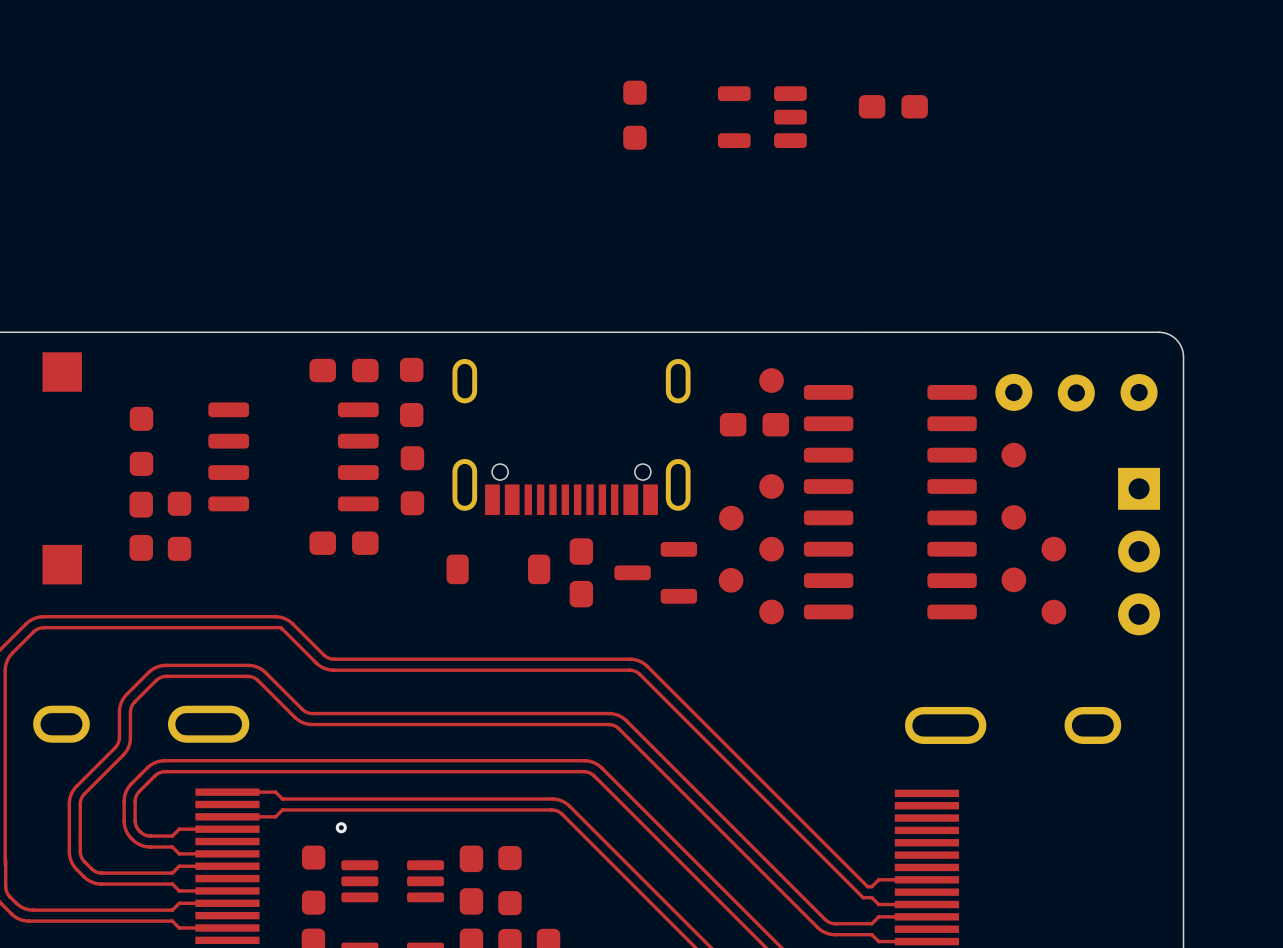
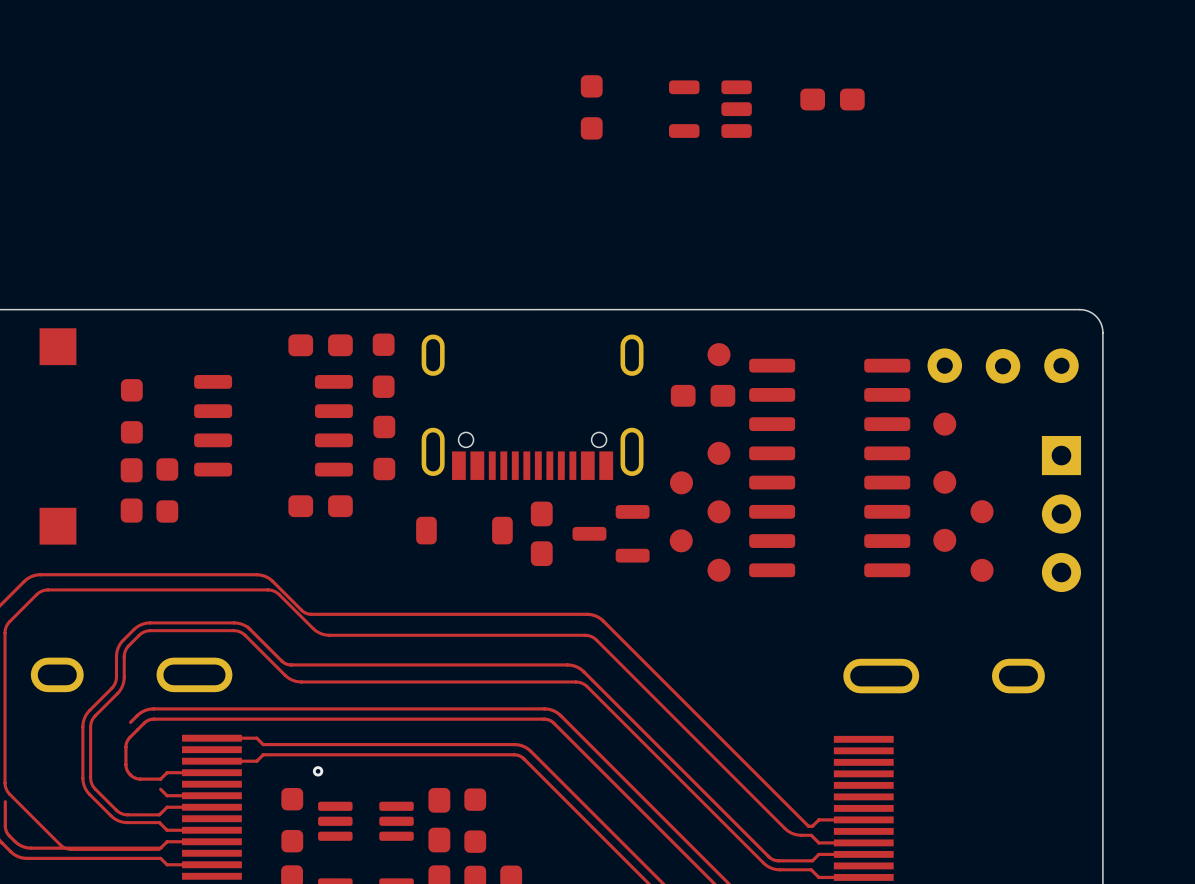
top track: (265, 672) (257, 667) (248, 665) (166, 665) (152, 669) (126, 694) (121, 702) (119, 738) (116, 745) (76, 786) (71, 794) (69, 803) (69, 856) (73, 865) (85, 878) (99, 883) (172, 884) -> (250, 629) (242, 624) (234, 622) (150, 622) (139, 625) (123, 640) (118, 647) (114, 685) (84, 717) (82, 778) (86, 790) (118, 820) (160, 823)
top track: (139, 775) (129, 785) (125, 794) (124, 820) (126, 830) (132, 839) (143, 845) (172, 847) -> none
top track: (5, 864) (5, 668) (10, 654) (34, 631) (43, 627) (280, 627) (318, 664) (331, 670) (635, 671) (863, 897) (871, 897) -> (159, 849) (65, 848) (6, 789) (5, 629) (9, 621) (41, 591) (271, 590) (279, 594) (314, 630) (327, 635) (589, 635) (596, 639) (786, 830) (796, 834) (812, 836)
top track: (172, 873) (101, 873) (92, 869) (83, 860) (80, 854) (81, 798) (126, 751) (130, 740) (131, 706) (158, 678) (166, 676) (249, 676) (257, 679) (296, 718) (309, 724) (614, 725) (819, 929) (832, 934) (871, 934) -> (160, 813) (121, 813) (94, 788) (90, 777) (91, 720) (121, 688) (124, 679) (125, 650) (142, 632) (150, 630) (235, 630) (245, 635) (286, 676) (296, 681) (582, 683) (765, 864) (777, 869) (812, 871)

